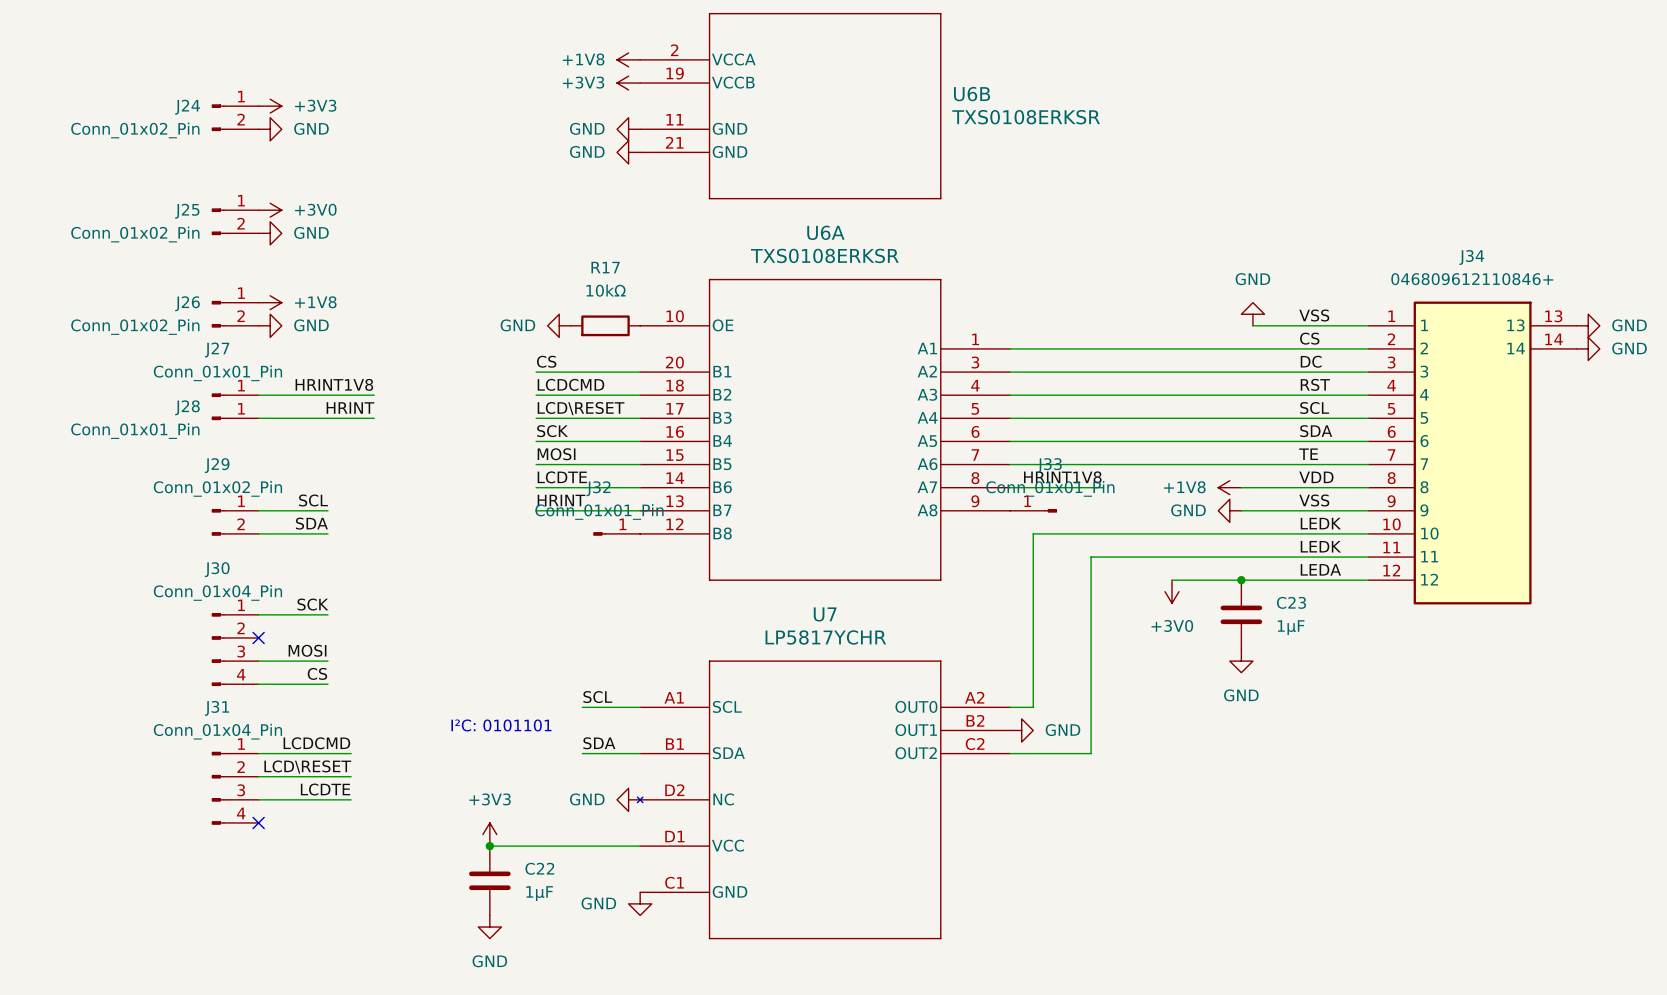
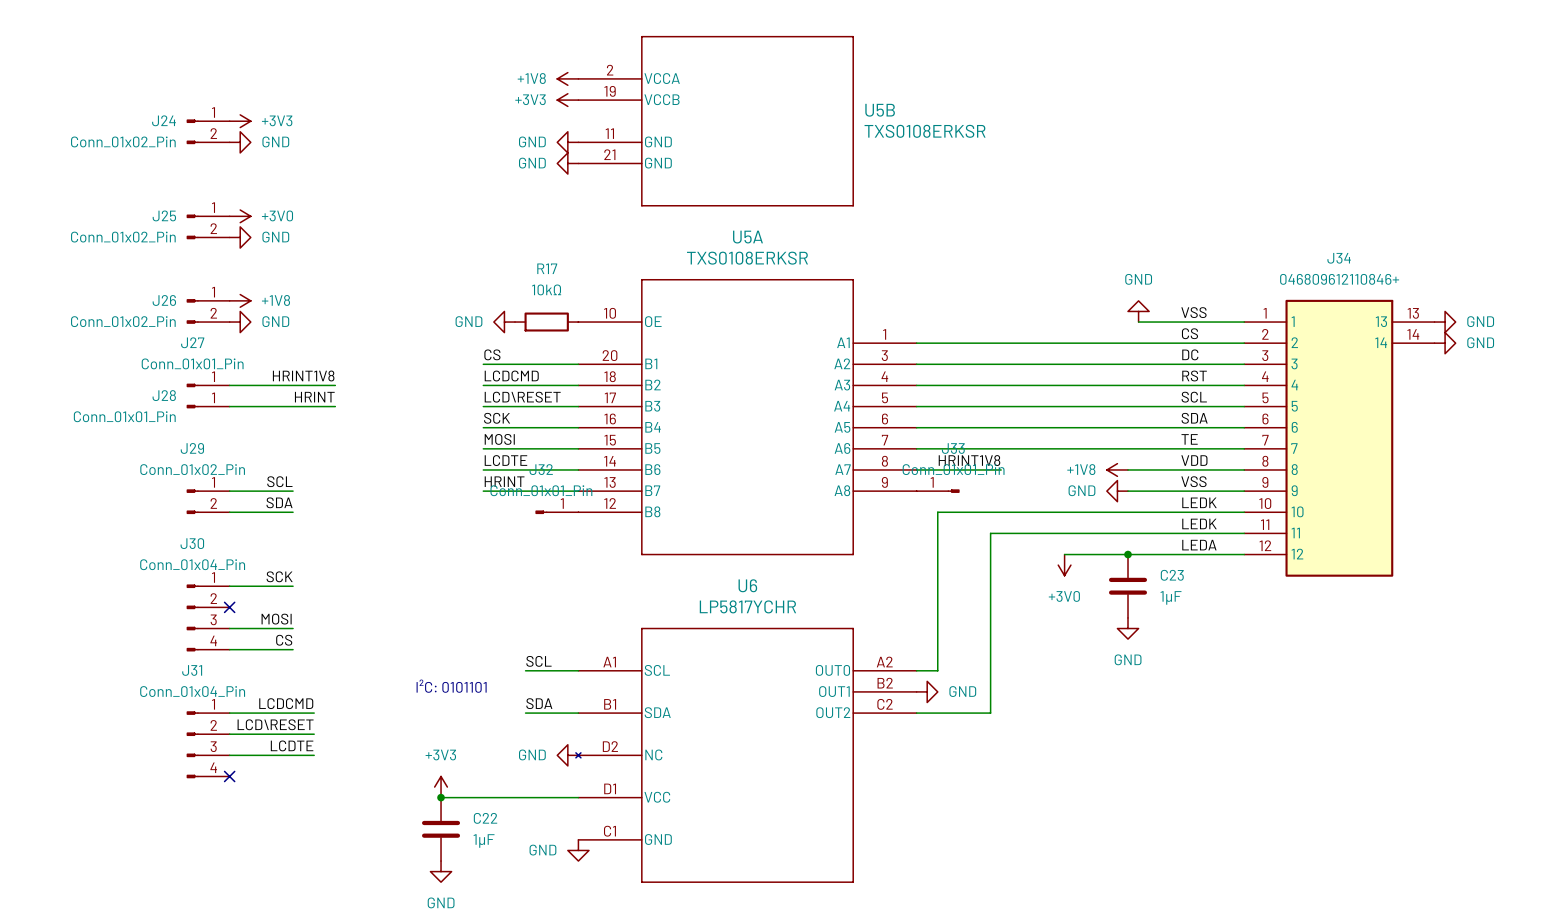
U6B name: U6B (972, 94) -> U5B (880, 110)
U6A name: U6A (825, 232) -> U5A (747, 237)
U7 name: U7 (825, 614) -> U6 (747, 585)

